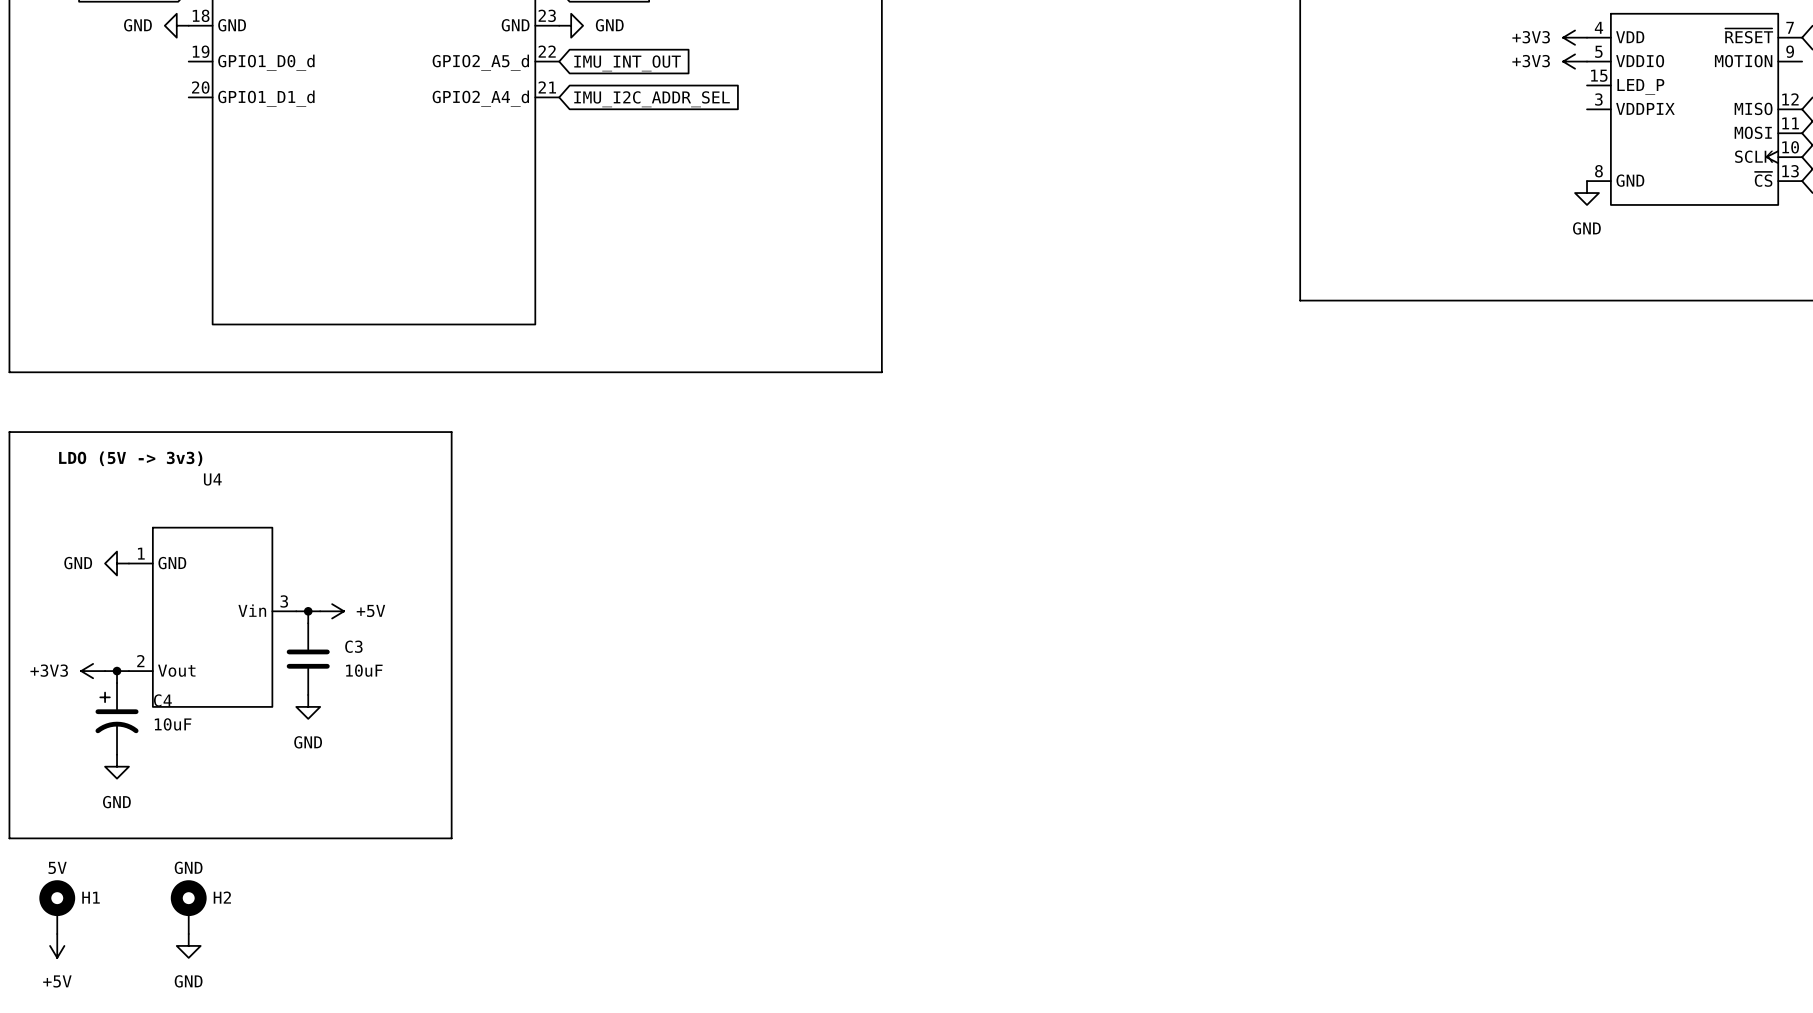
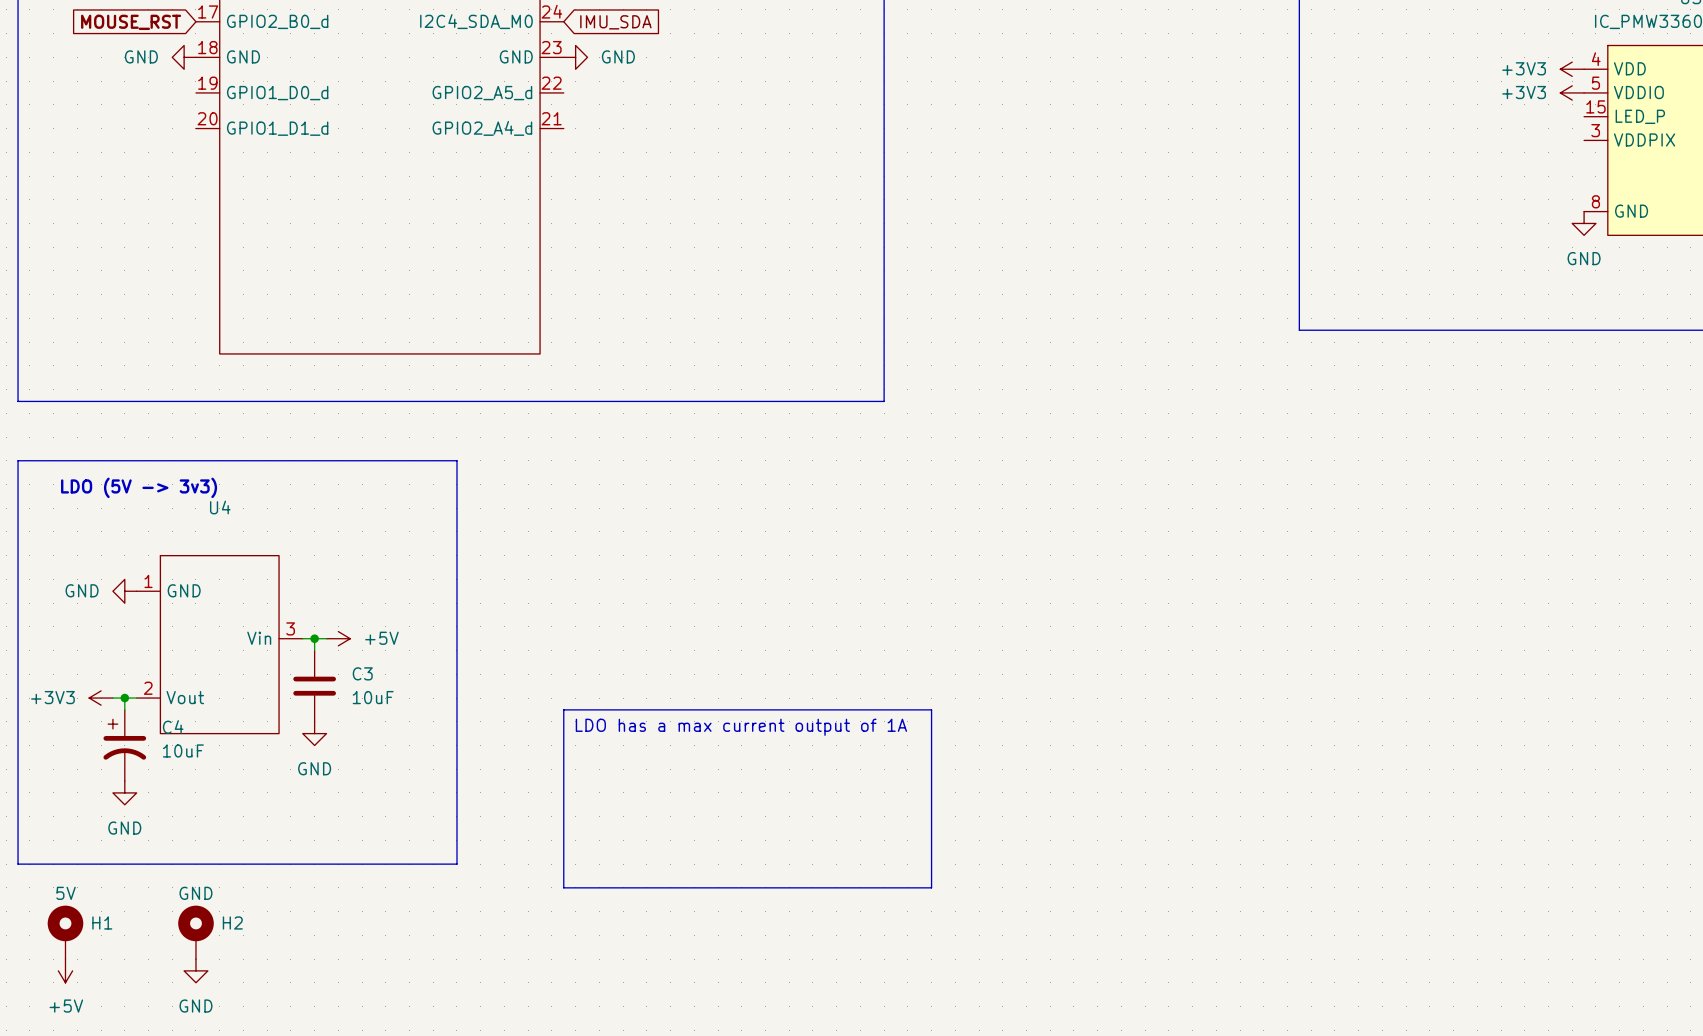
global label: IMU_INT_OUT (627, 63) -> none
global label: IMU_I2C_ADDR_SEL (652, 99) -> none
line: none -> (563, 709) (931, 709) (931, 887) (563, 887) (563, 709)
text: none -> LDO has a max current output of 1A (741, 727)

